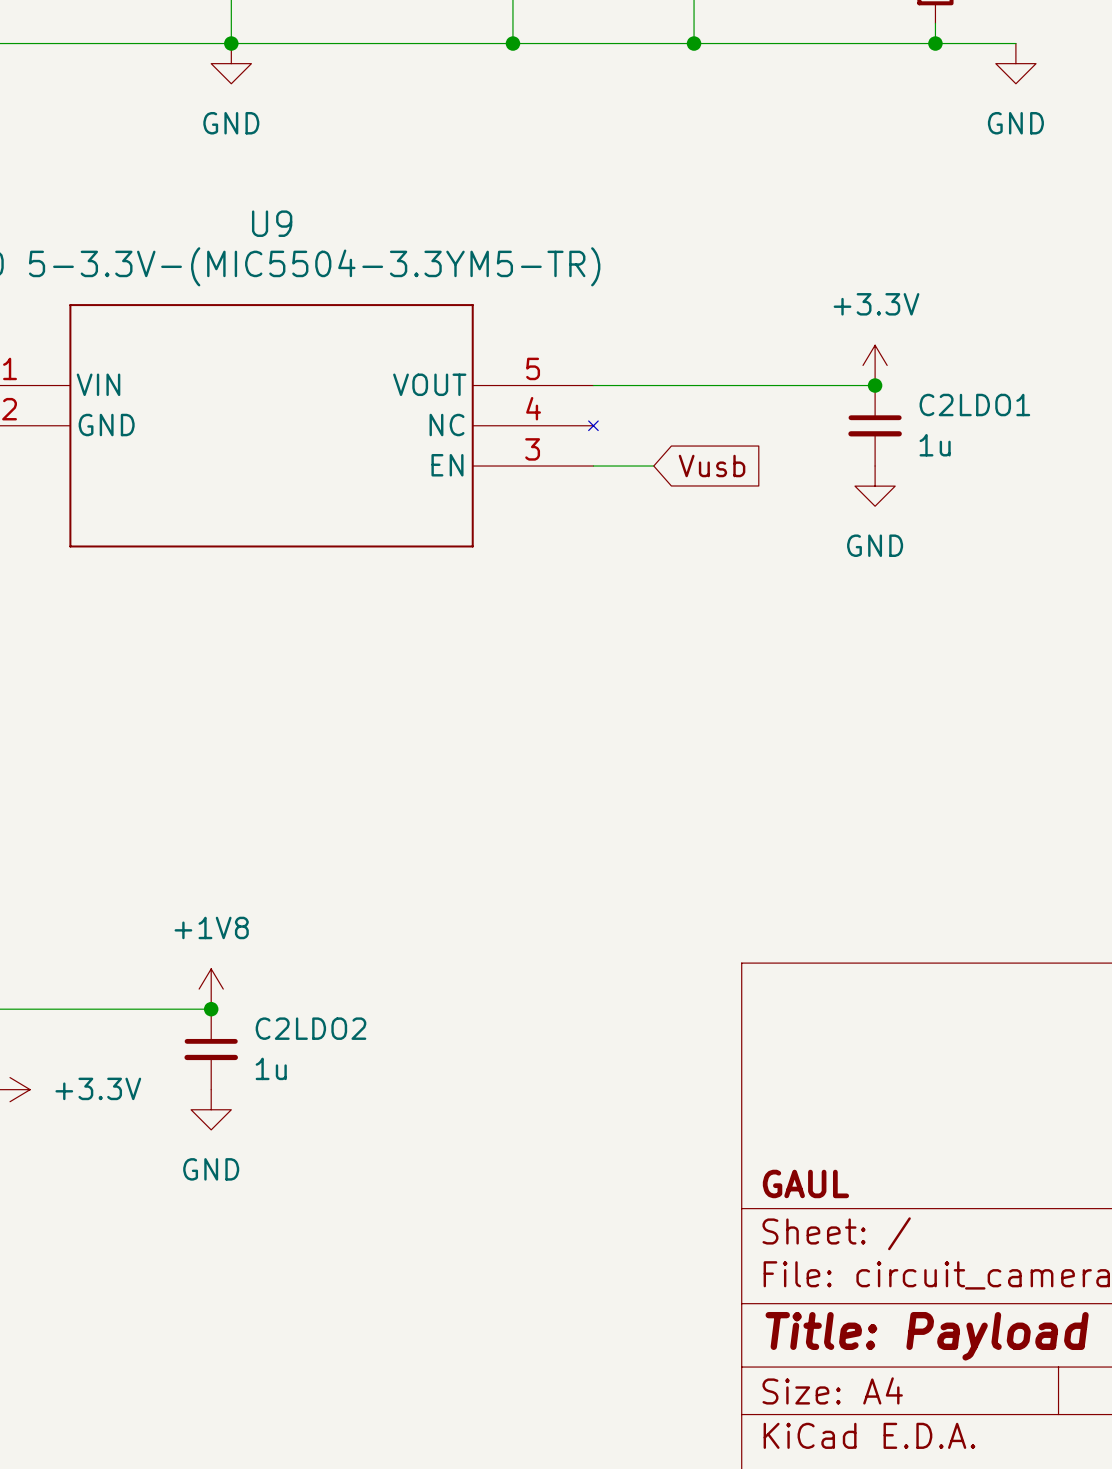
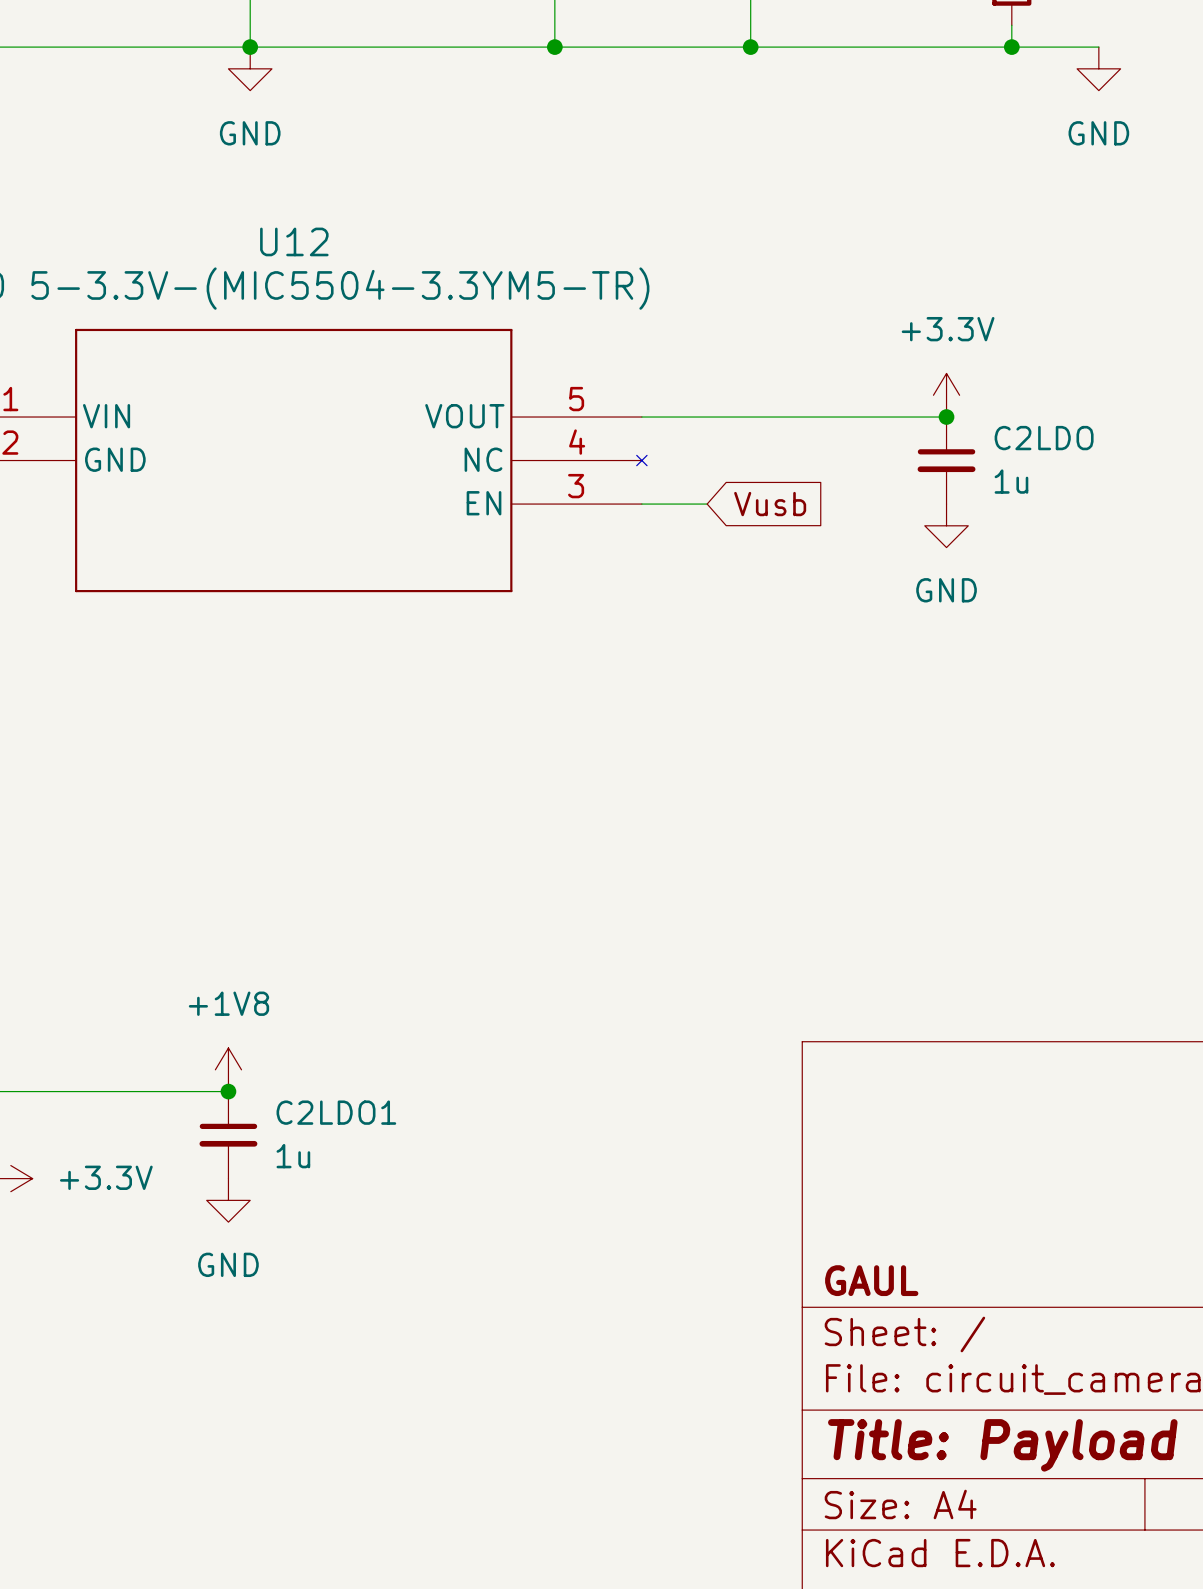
U9 name: U9 (272, 223) -> U12 (294, 241)
C2LDO1 name: C2LDO1 (974, 405) -> C2LDO (1044, 438)
C2LDO2 name: C2LDO2 (310, 1028) -> C2LDO1 (336, 1112)

